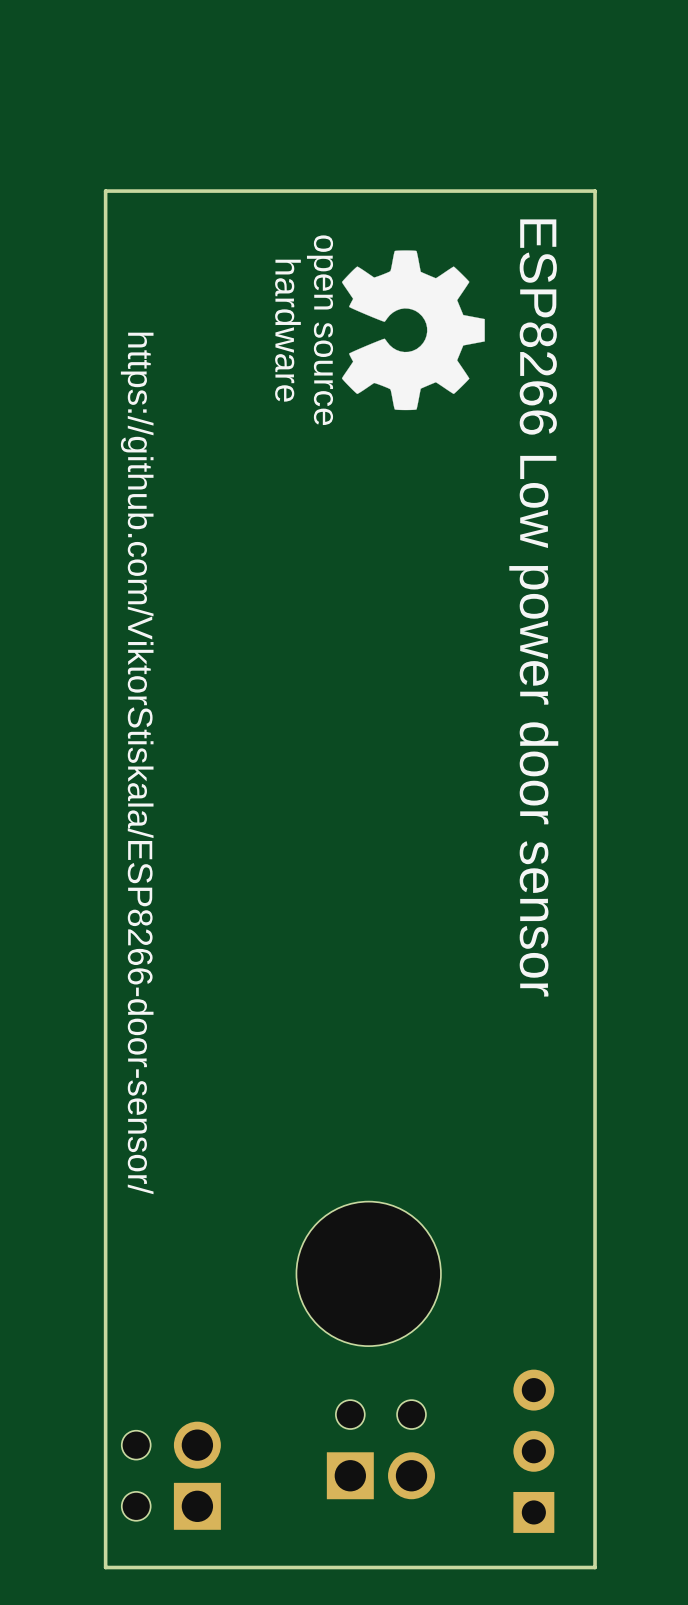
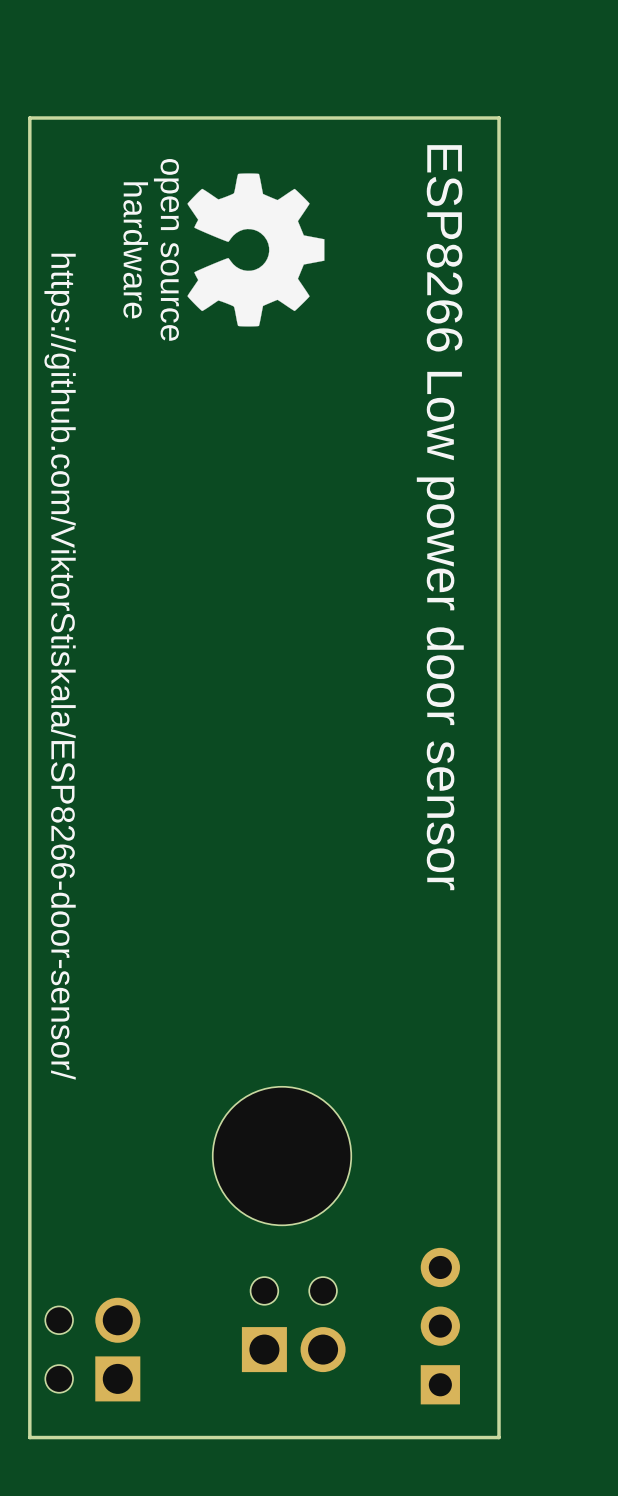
text position: hardware (287, 330) -> hardware (135, 250)
text position: open source (320, 330) -> open source (166, 249)
drawing position: (413, 330) -> (255, 249)

